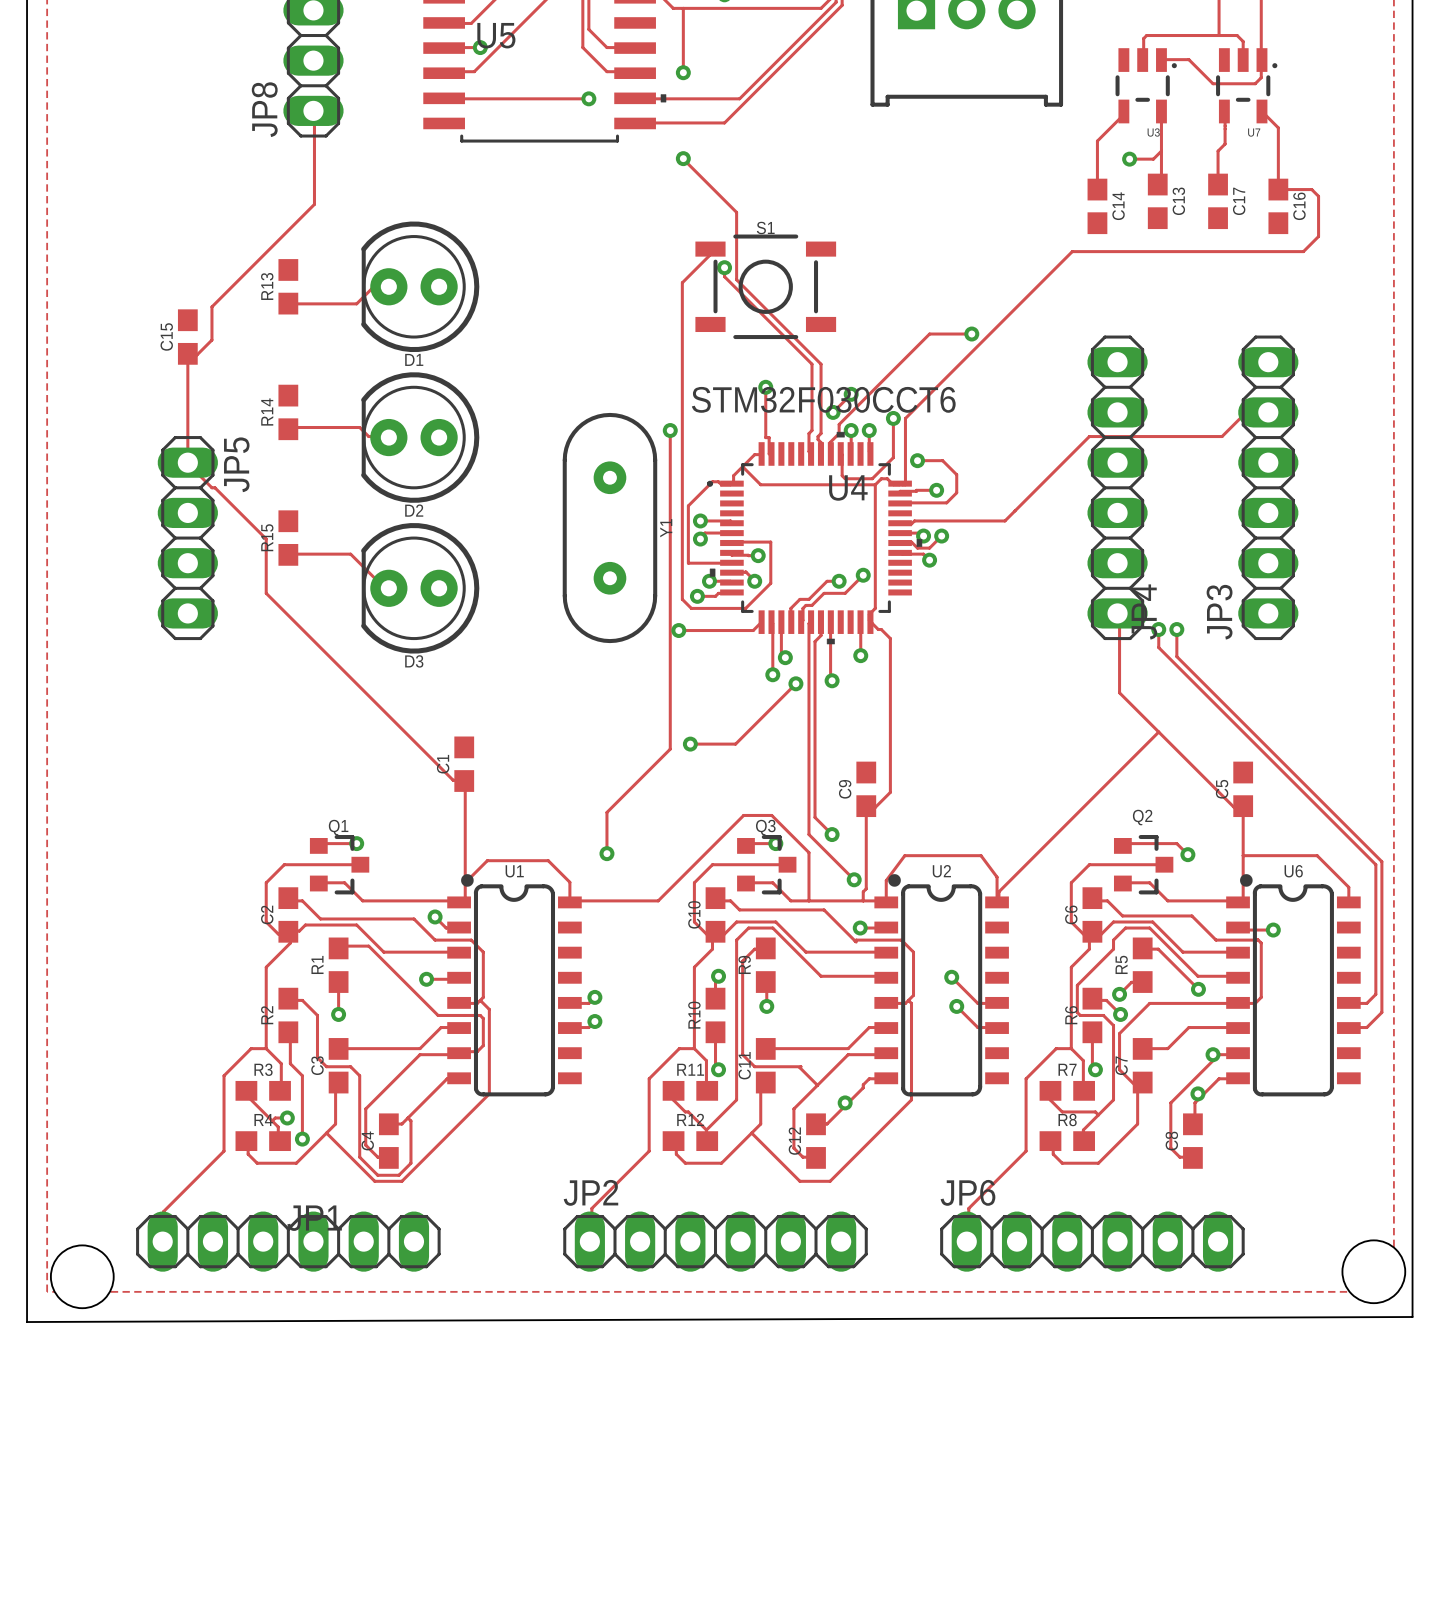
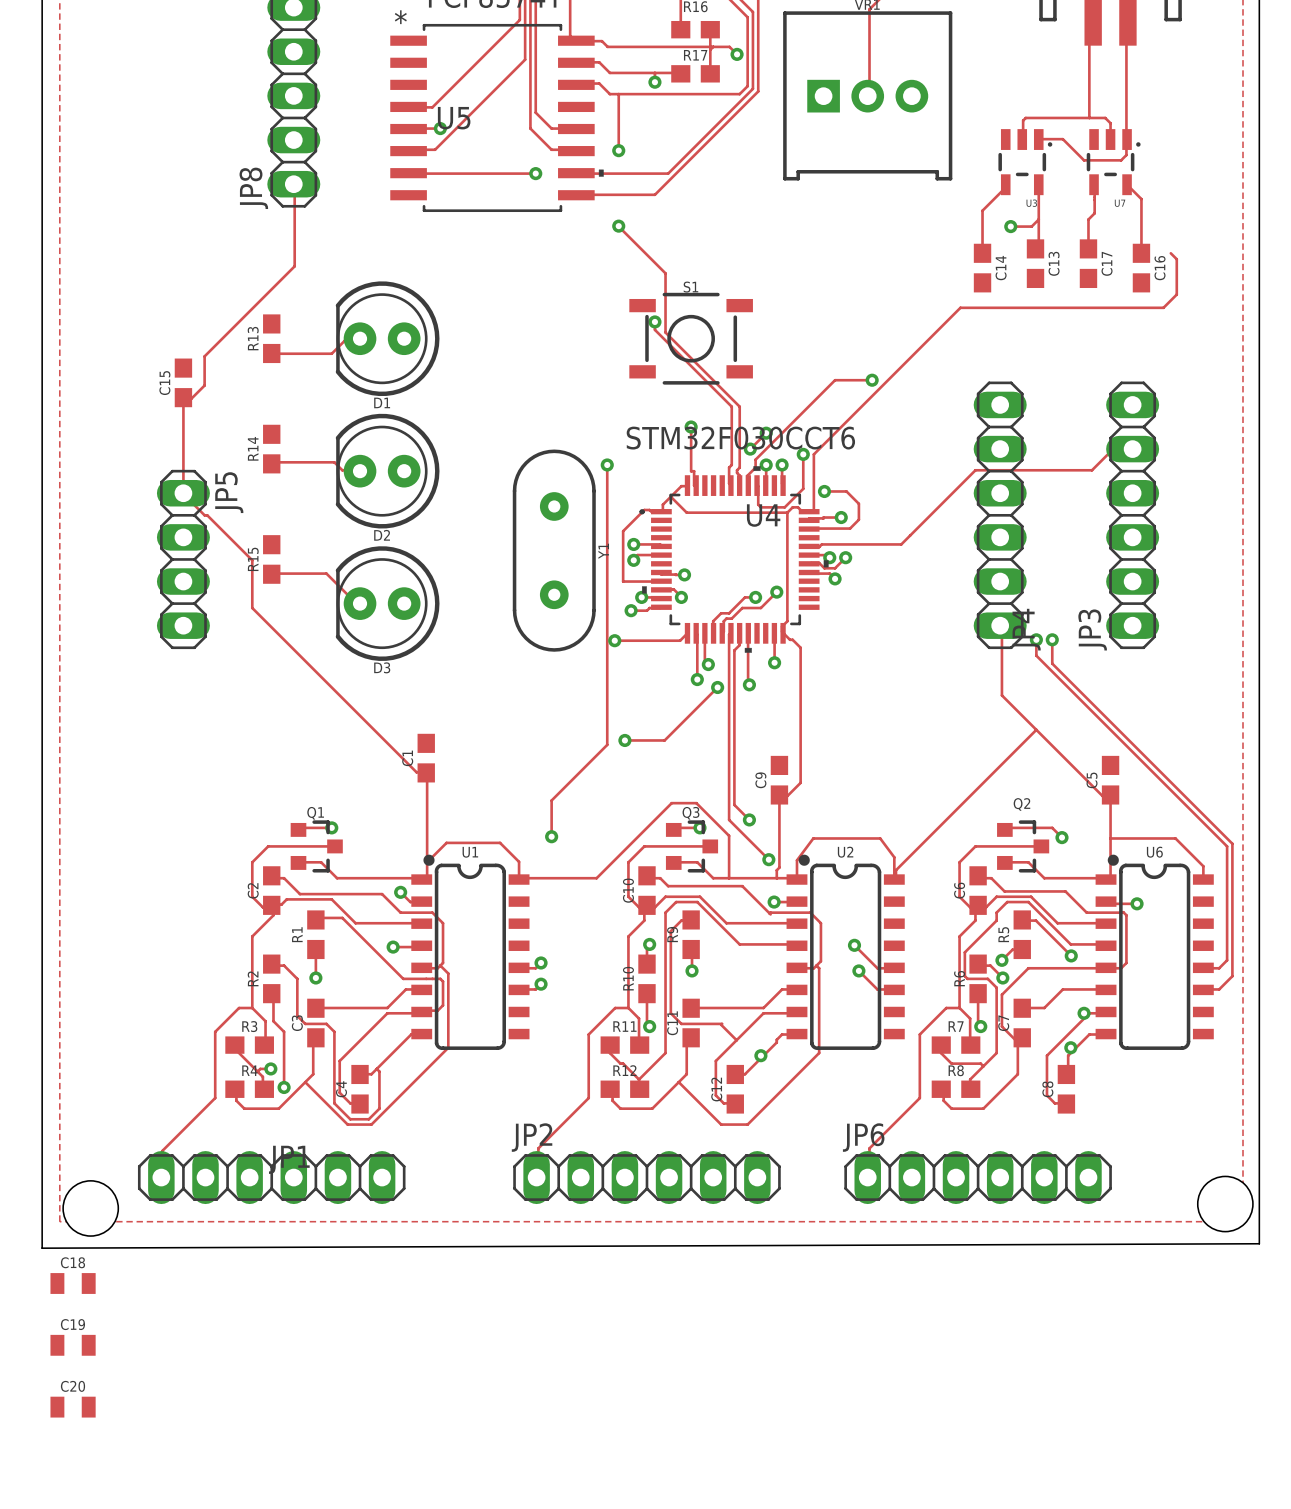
track: (1278, 189) (1311, 189) -> none
track: (710, 249) (709, 255) (682, 282) (682, 599) (691, 608) (745, 608) (770, 583) (770, 542) (731, 543) -> none
C18: none -> (73, 1283)
C19: none -> (73, 1345)
C20: none -> (73, 1407)

